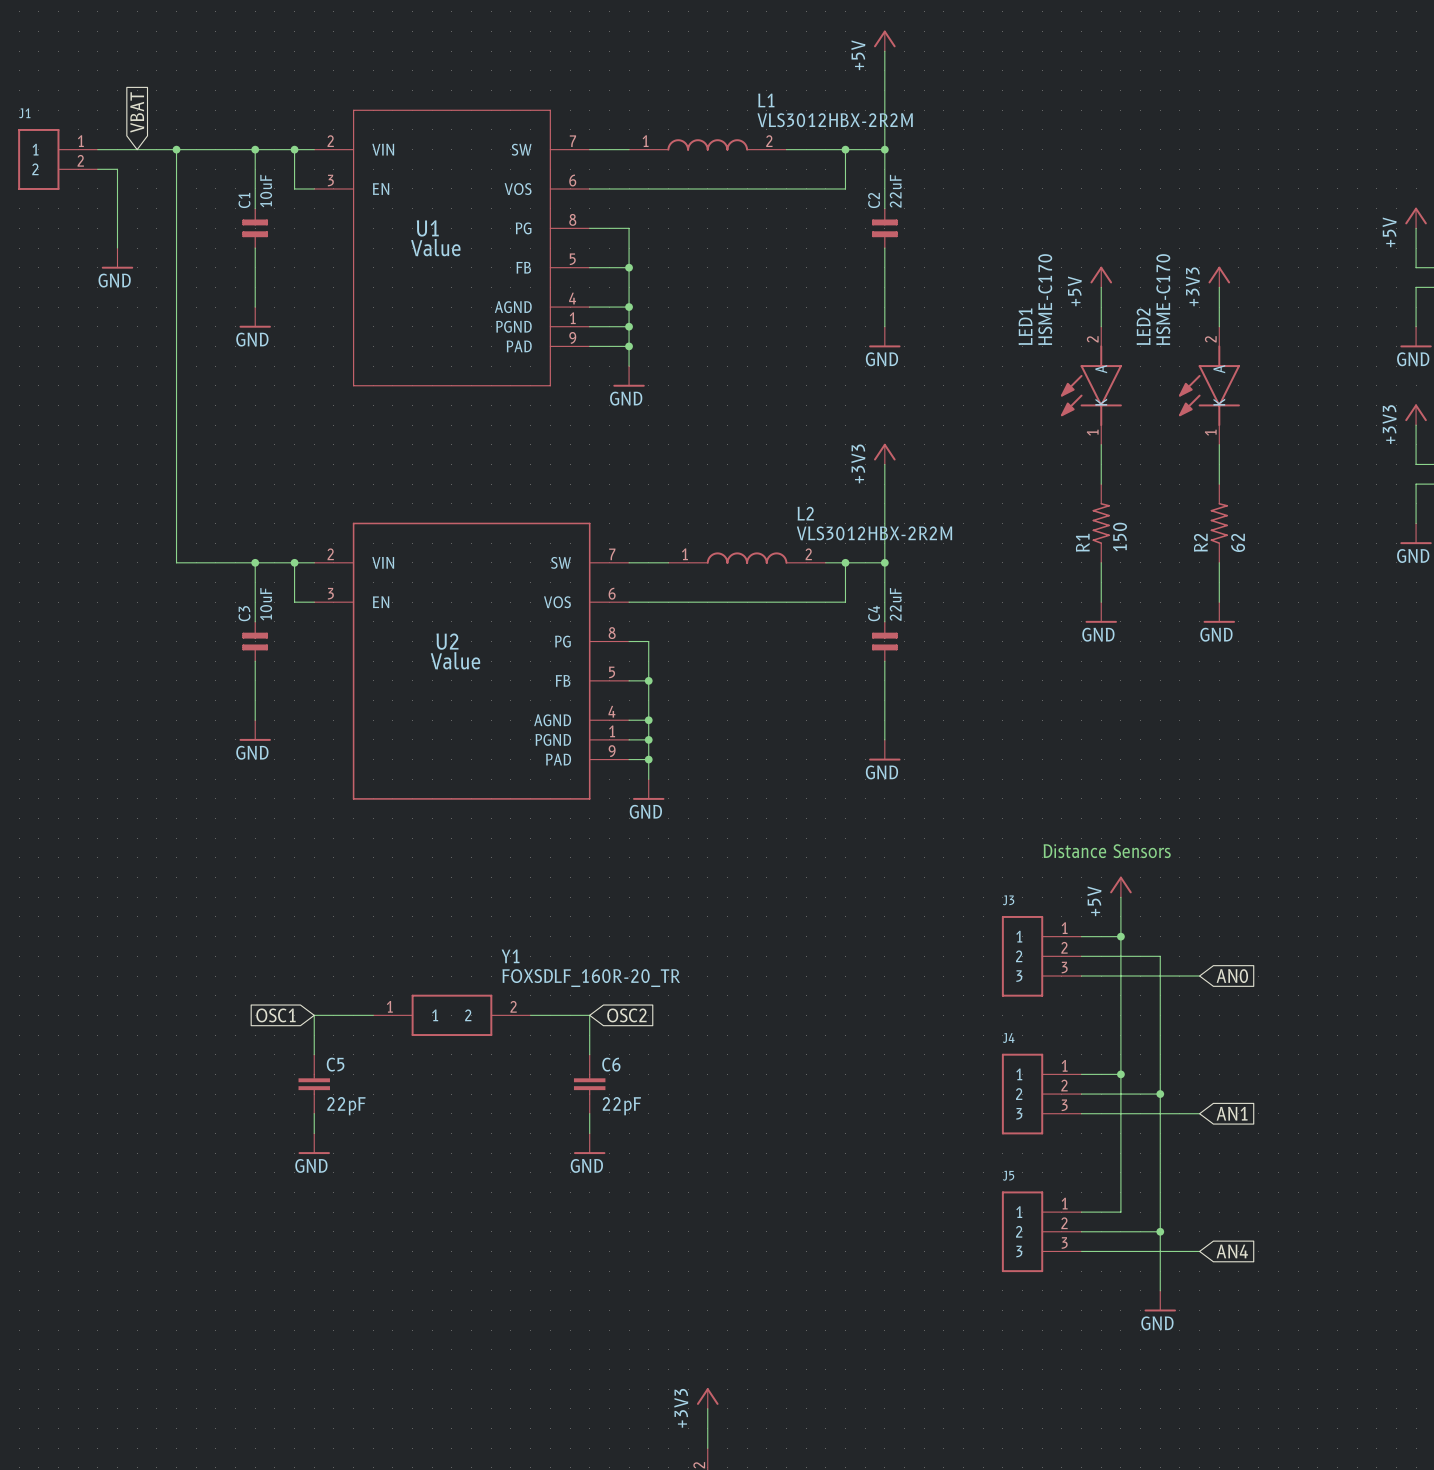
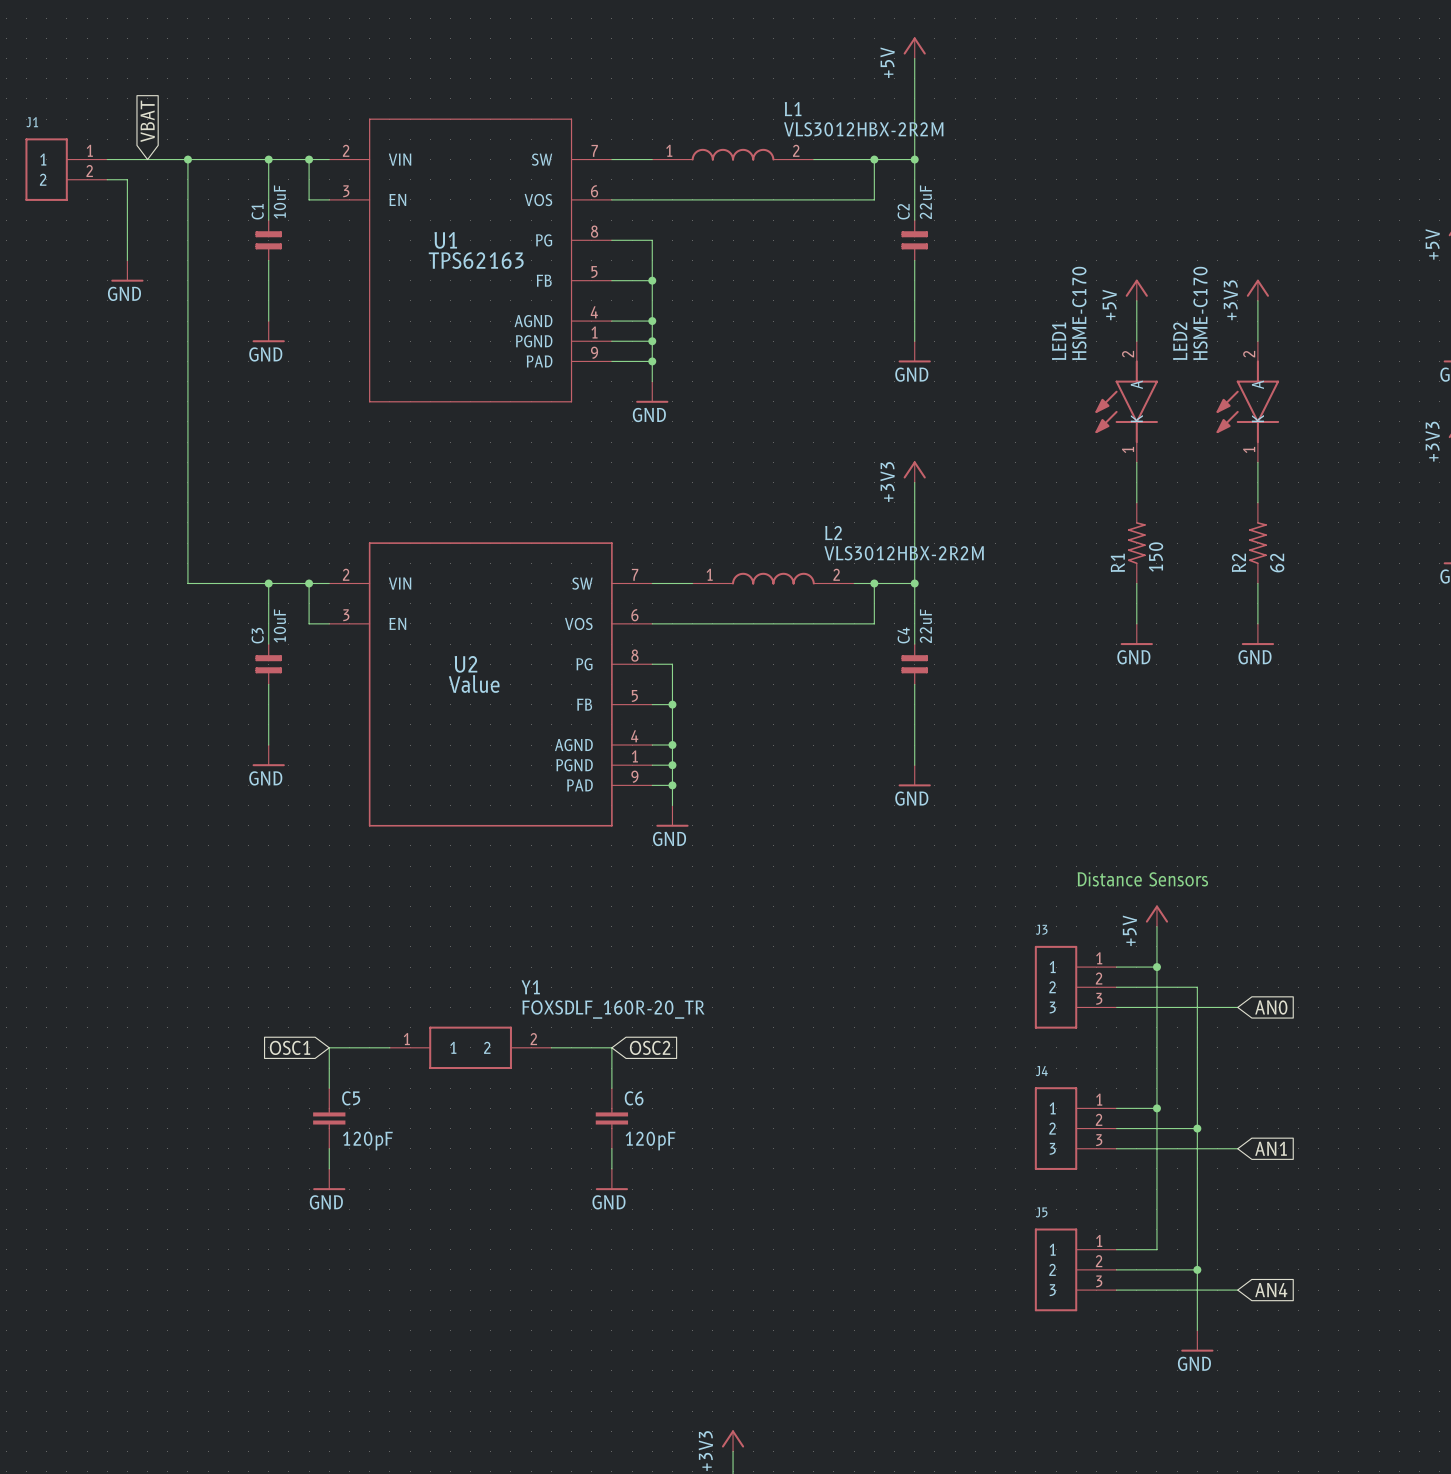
U1 value: Value (435, 247) -> TPS62163 (476, 260)
C5 value: 22pF (346, 1106) -> 120pF (367, 1140)
C6 value: 22pF (621, 1106) -> 120pF (650, 1140)

